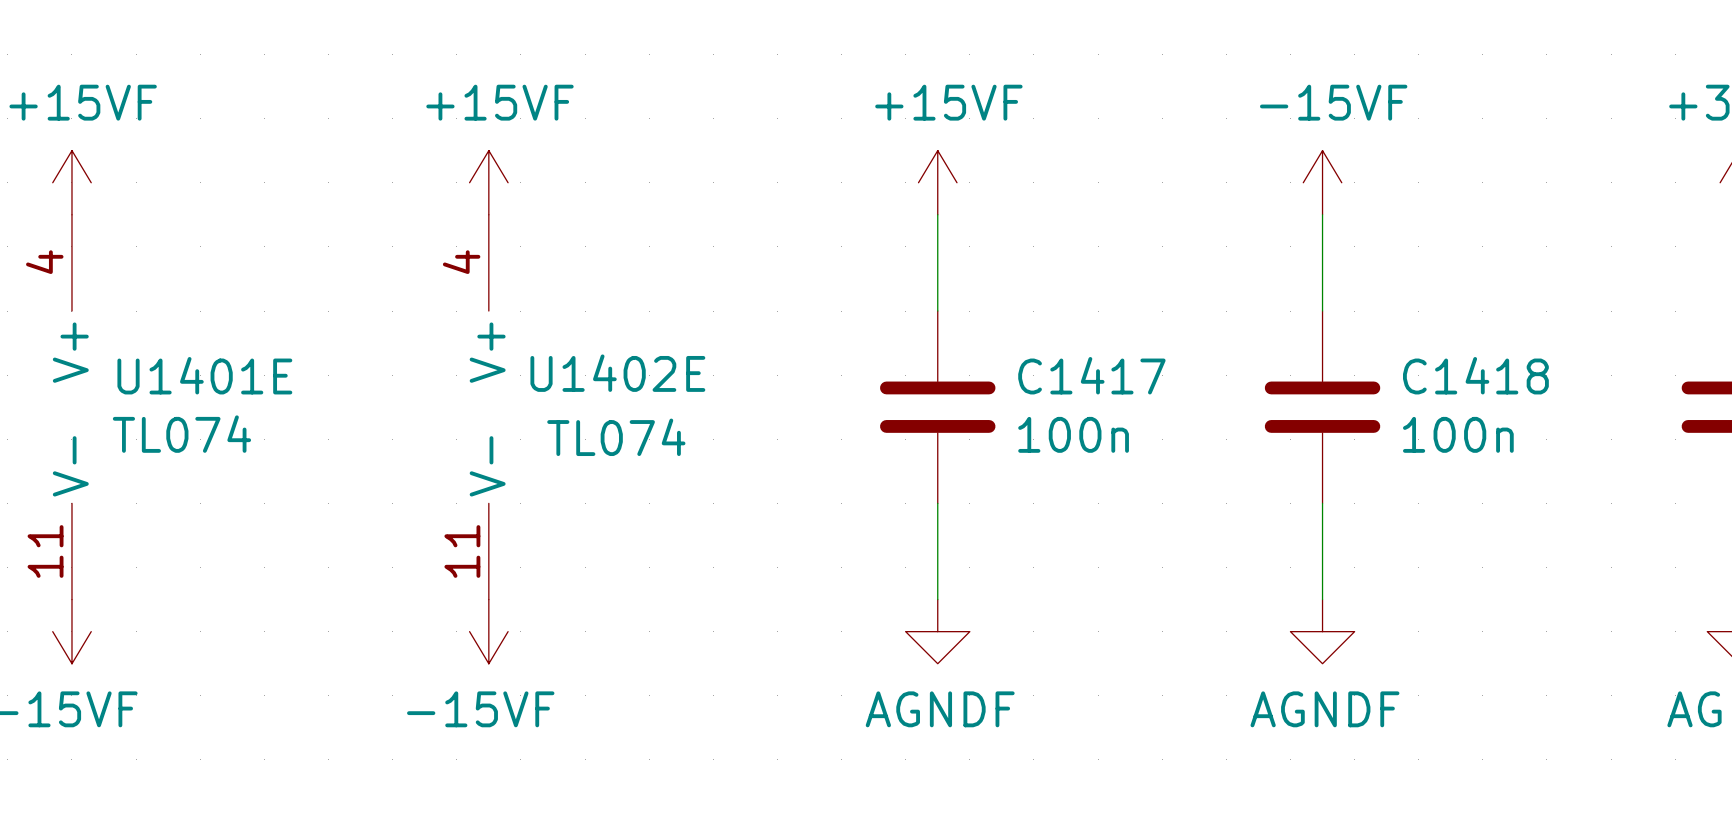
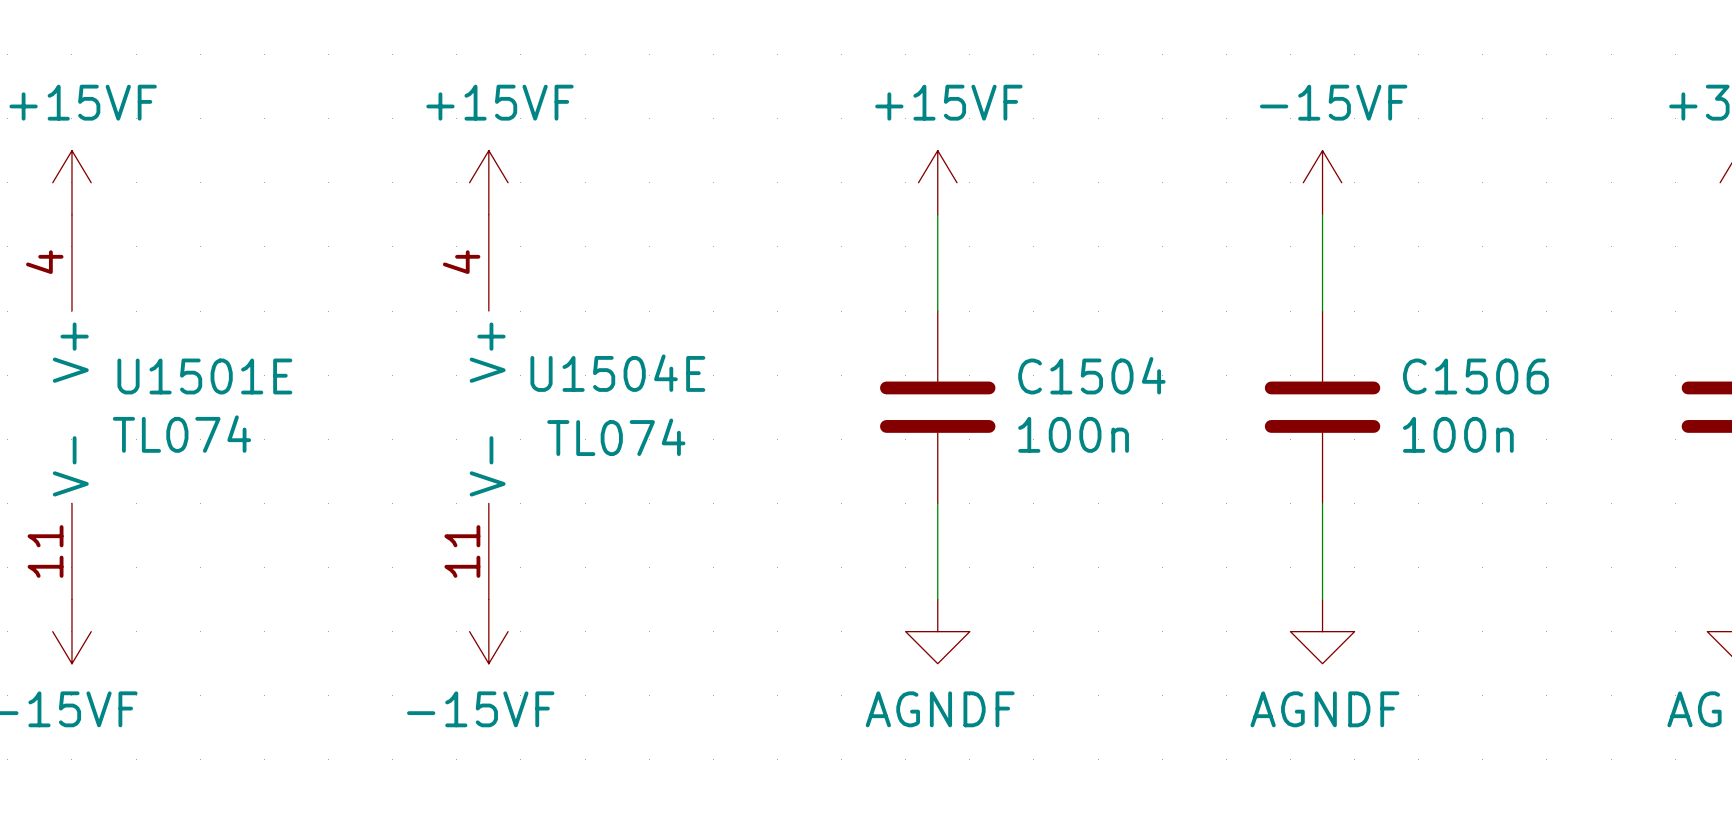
U1402E name: U1402E (617, 373) -> U1504E (617, 373)
U1401E name: U1401E (204, 375) -> U1501E (204, 376)
C1417 name: C1417 (1091, 375) -> C1504 (1091, 375)
C1418 name: C1418 (1475, 375) -> C1506 (1475, 376)

